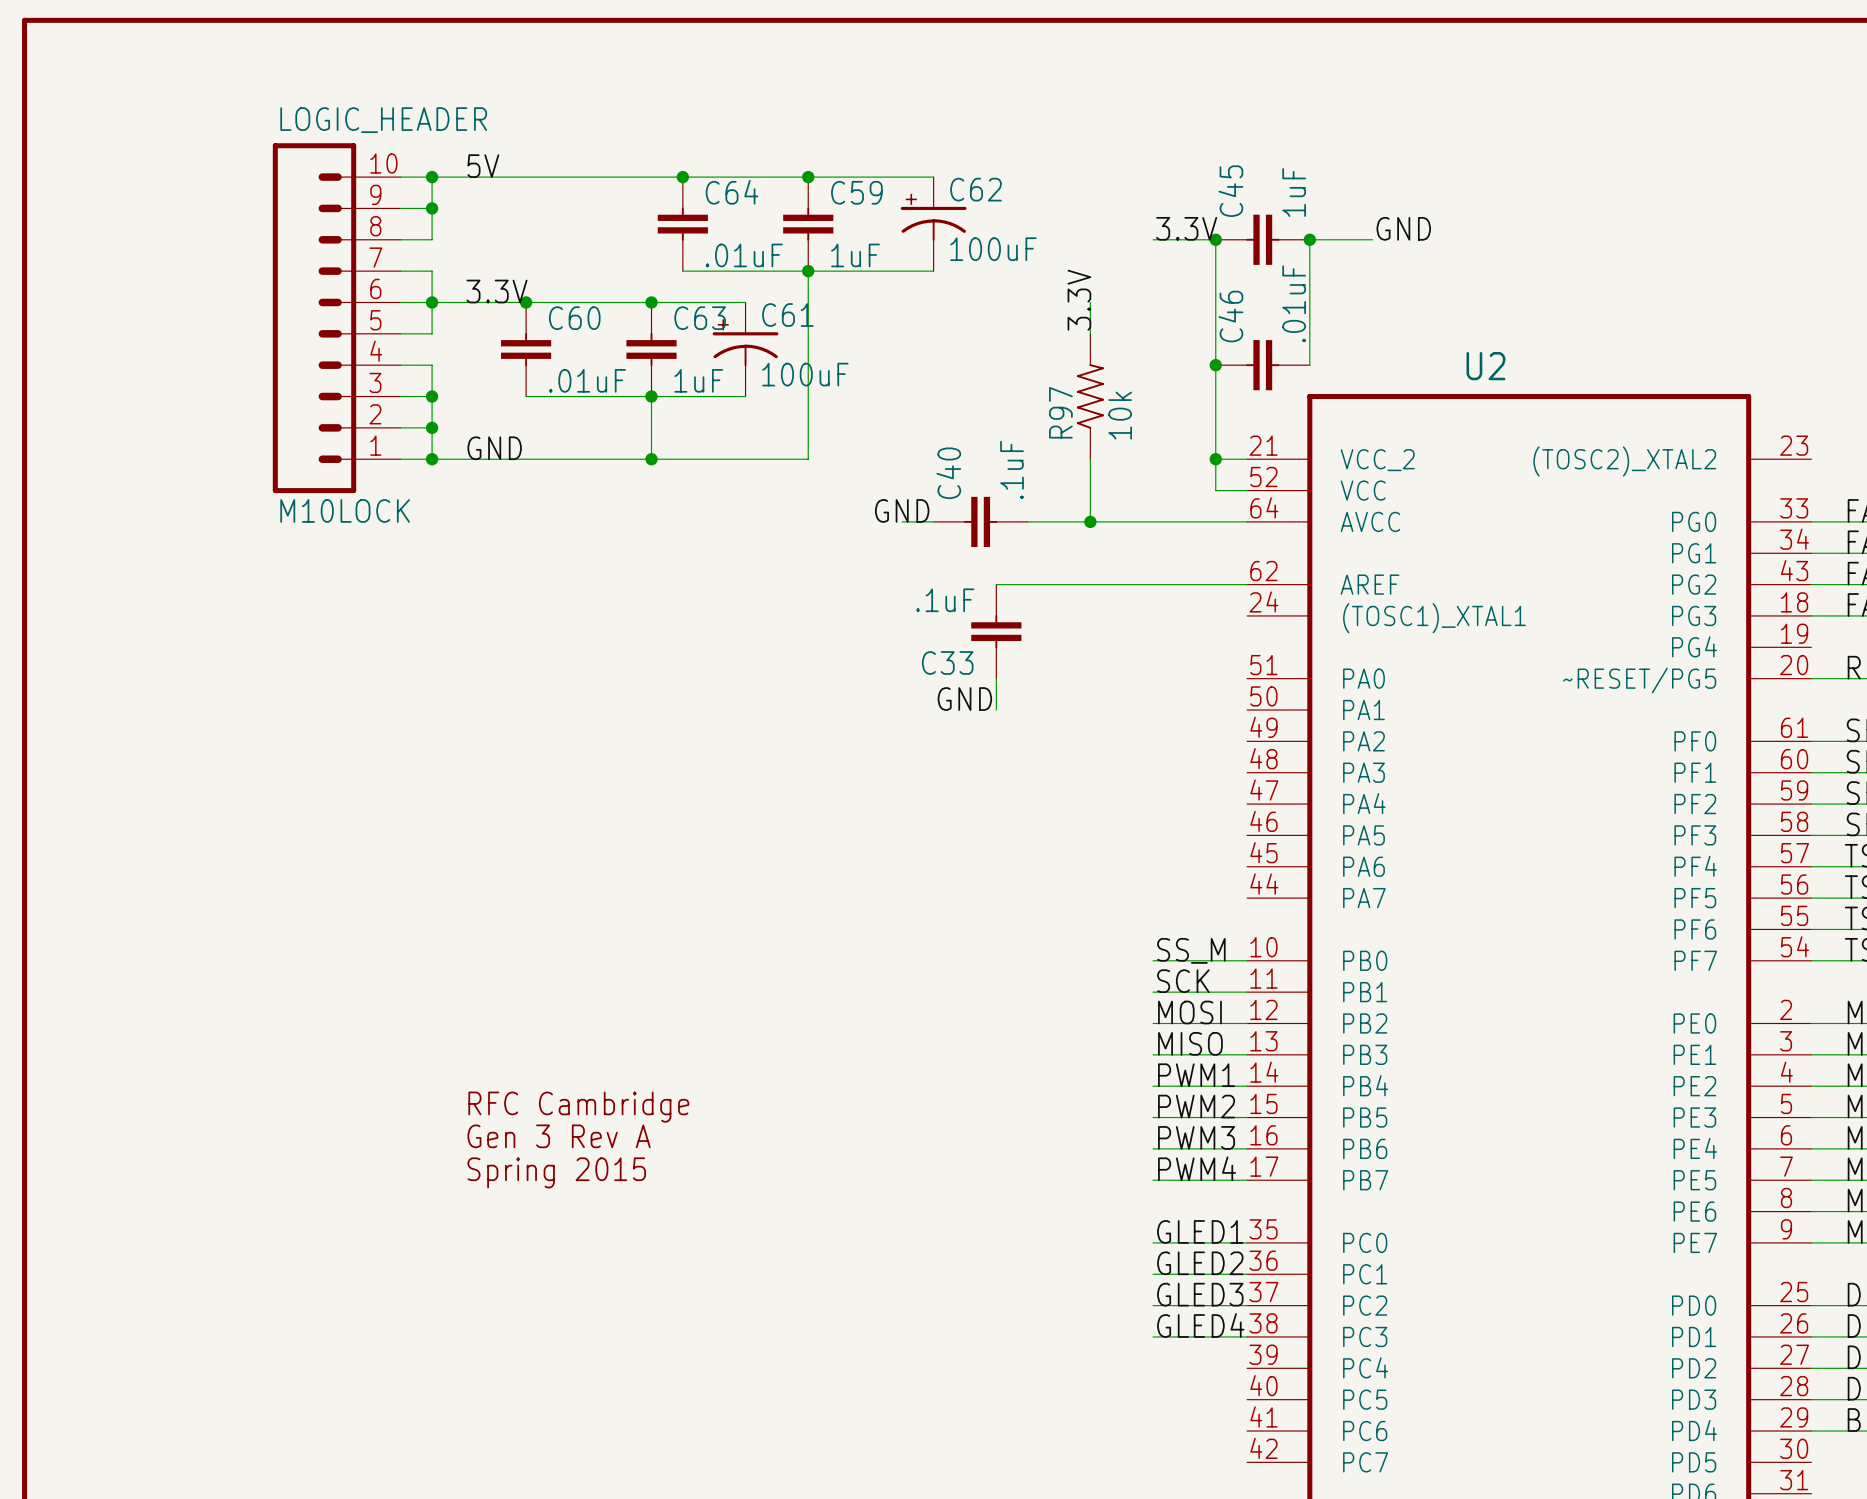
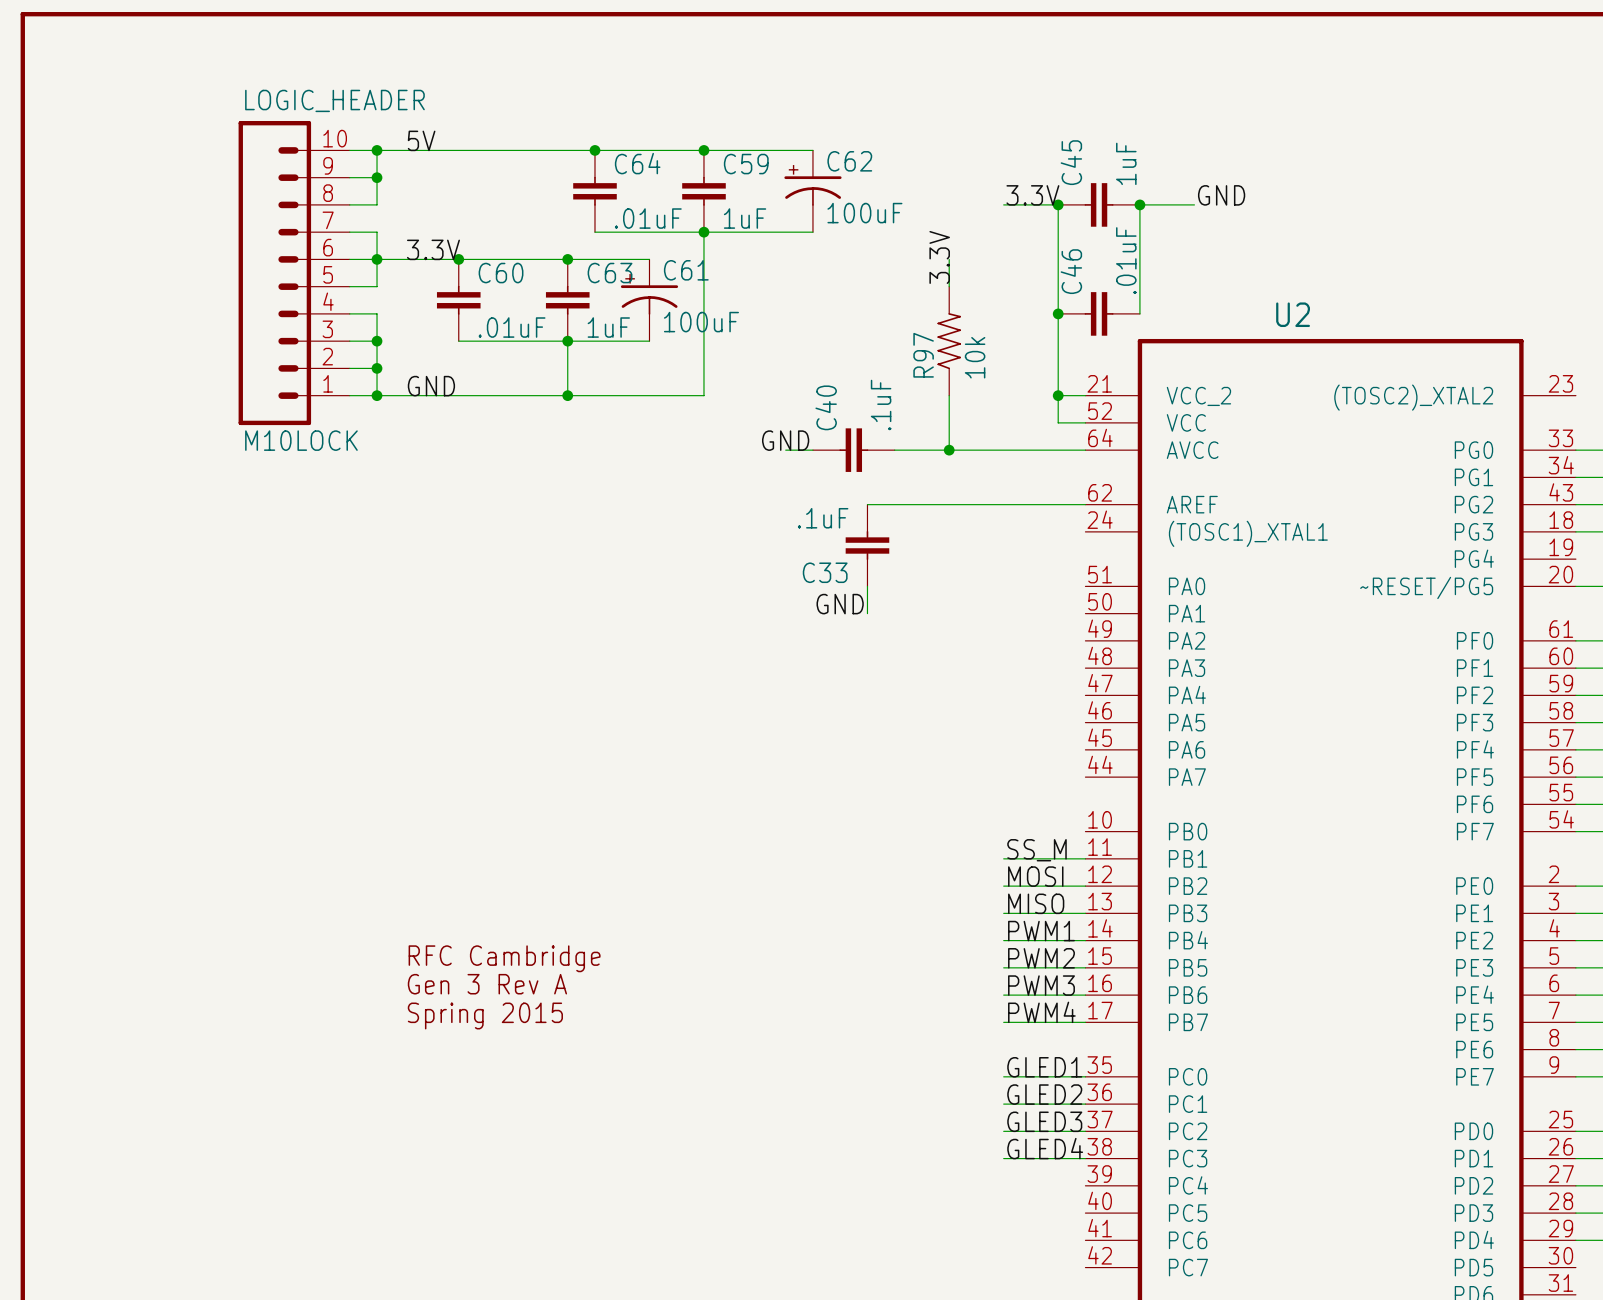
label: SS_M (1191, 950) -> none
wire: (1153, 960) (1247, 960) -> none
label: SCK (1183, 981) -> SS_M (1037, 850)

